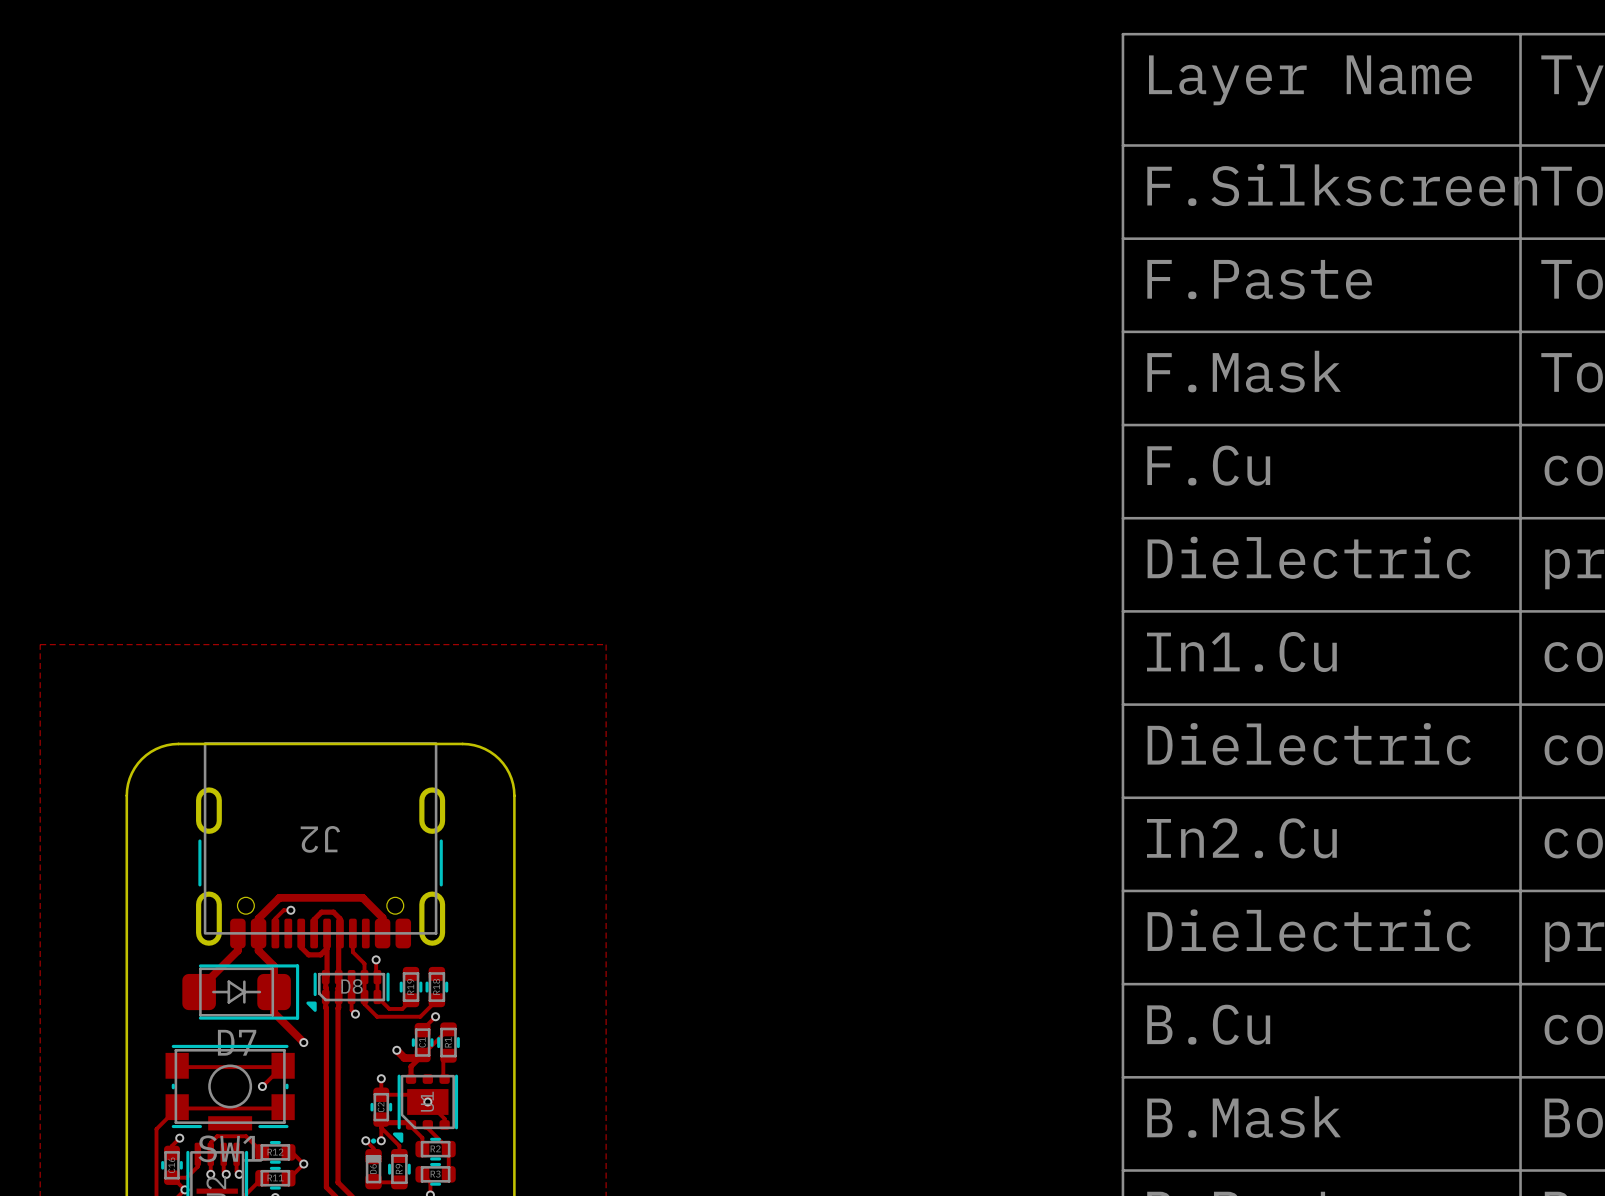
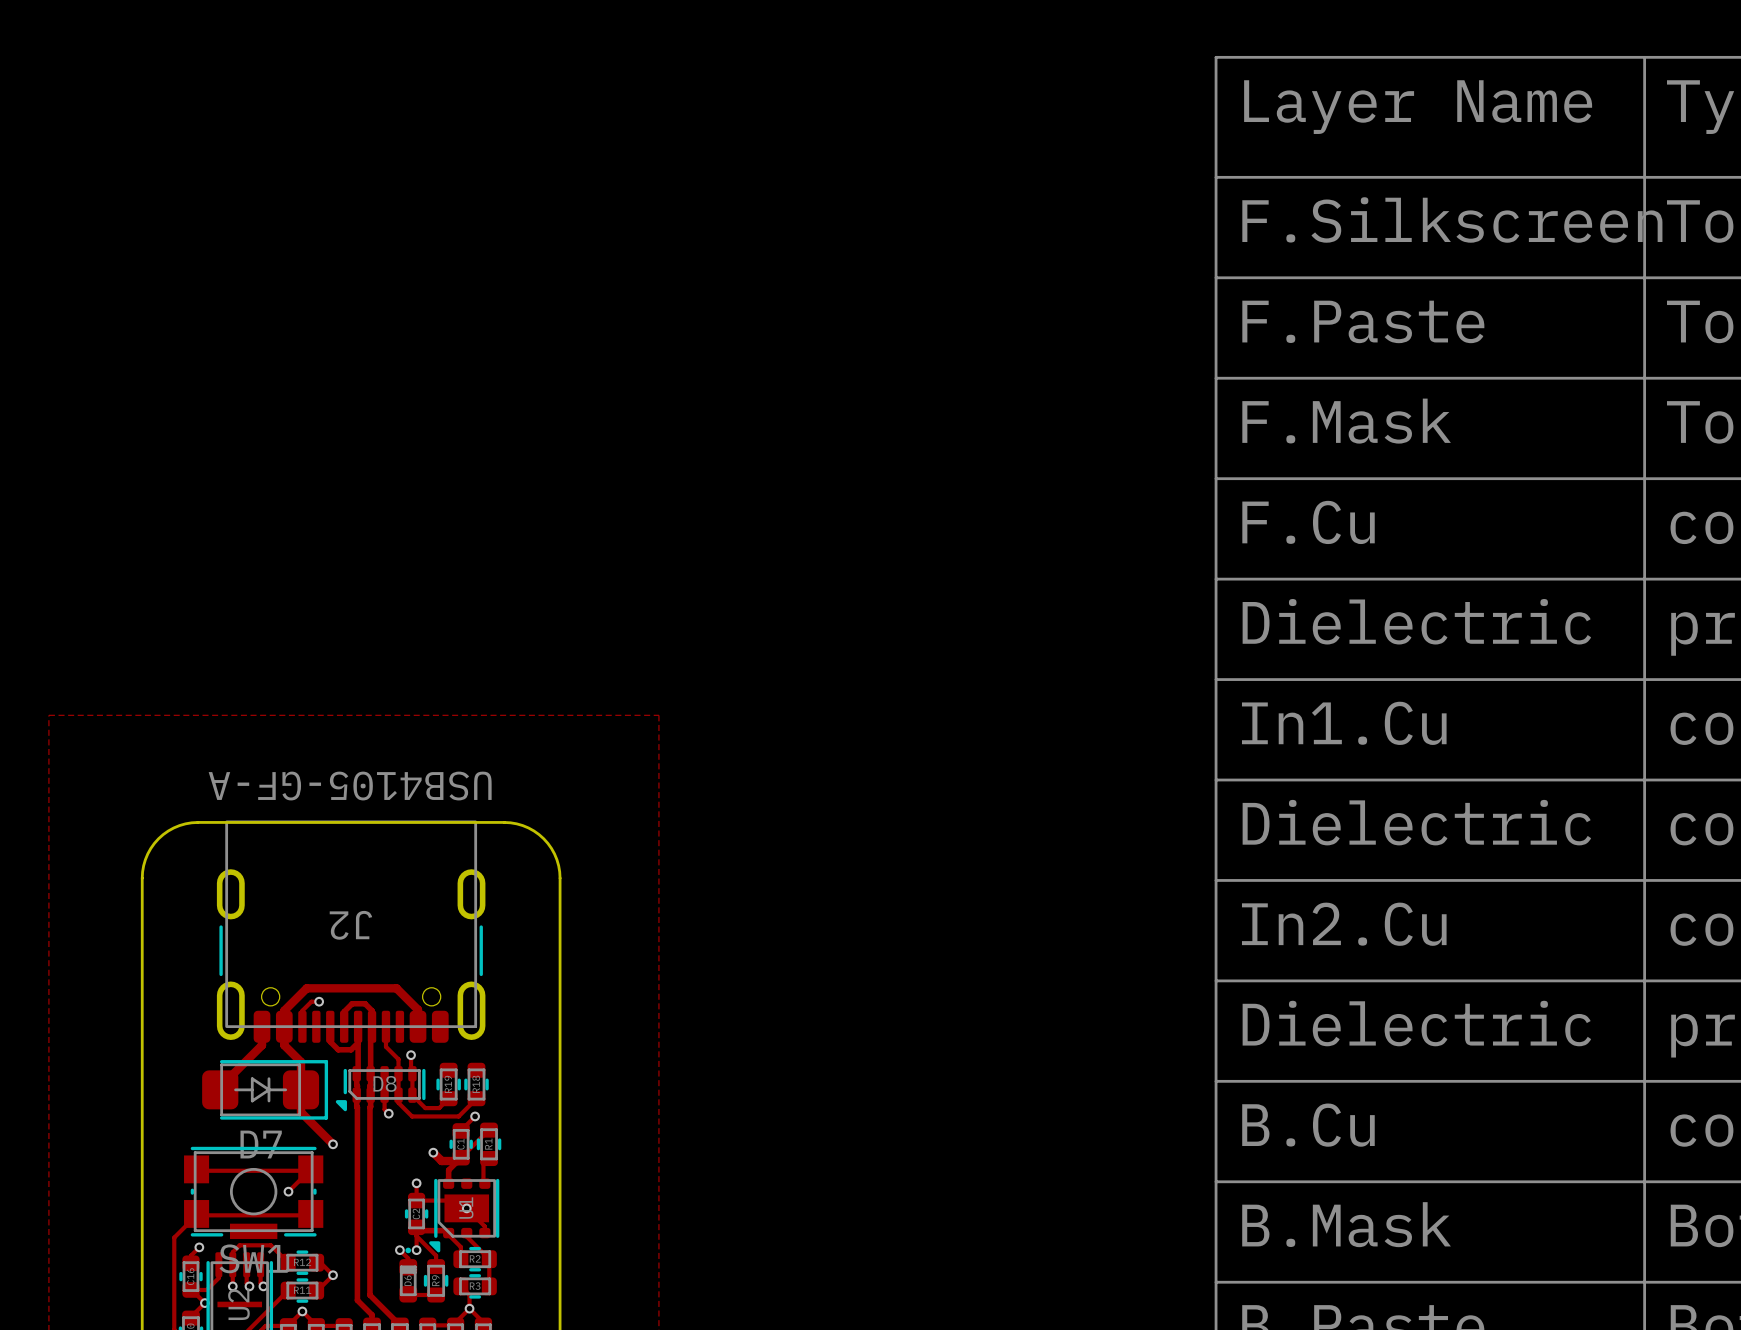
J2 value: none -> USB4105-GF-A (350, 786)

